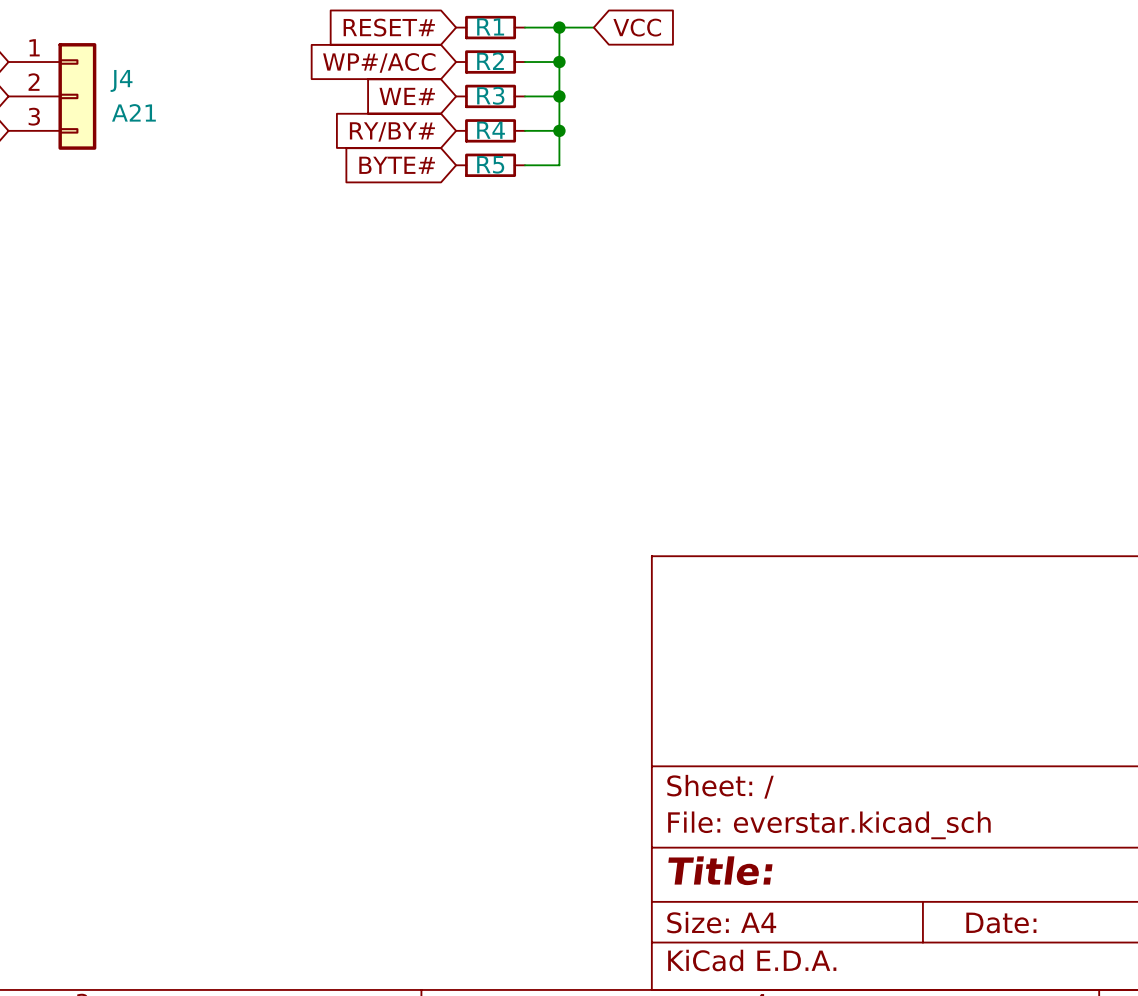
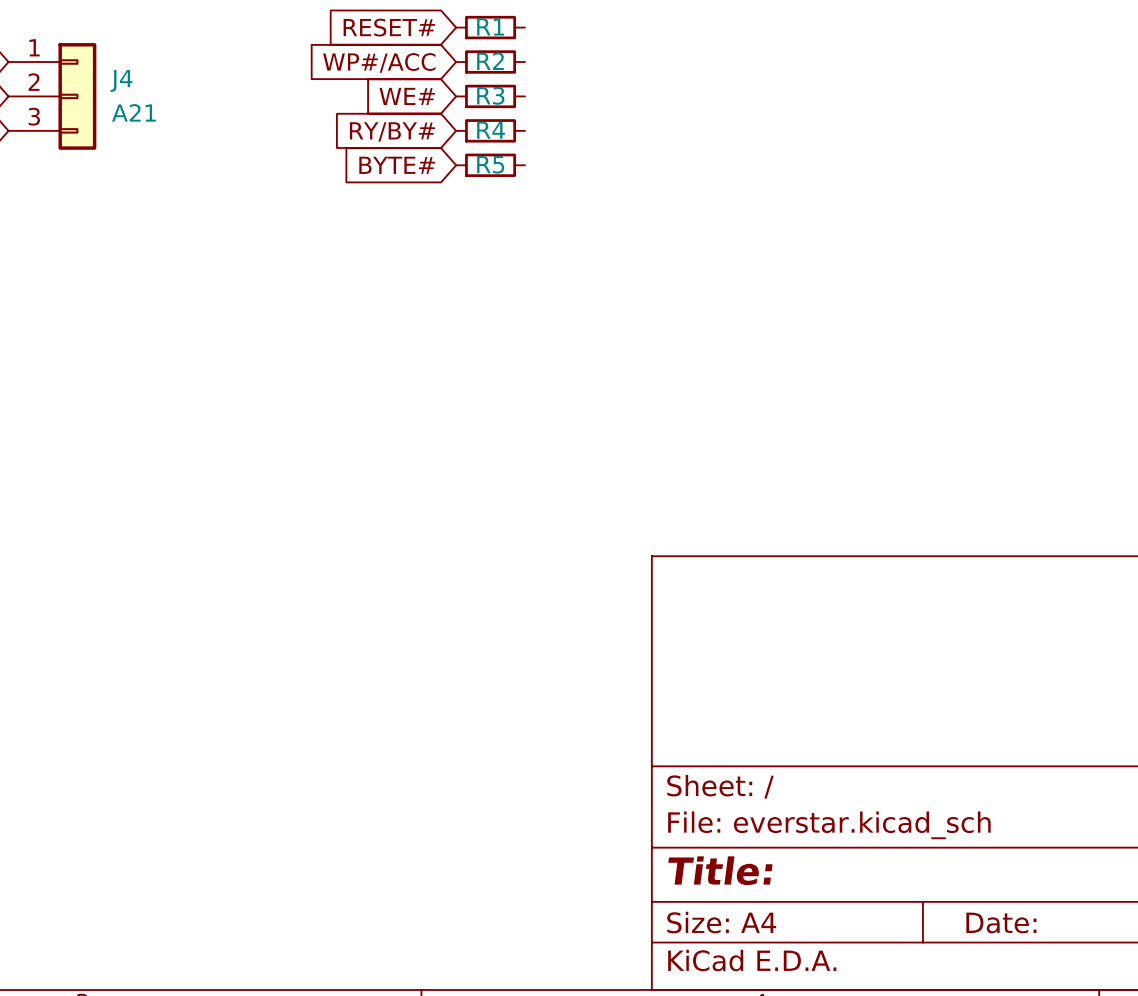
wire: (524, 27) (593, 27) -> none
wire: (559, 27) (559, 165) (524, 165) -> none
junction: (559, 27) -> none
global label: VCC (637, 27) -> none
wire: (524, 62) (559, 62) -> none
junction: (559, 62) -> none
wire: (524, 96) (559, 96) -> none
junction: (559, 96) -> none
wire: (524, 130) (559, 130) -> none
junction: (559, 130) -> none

